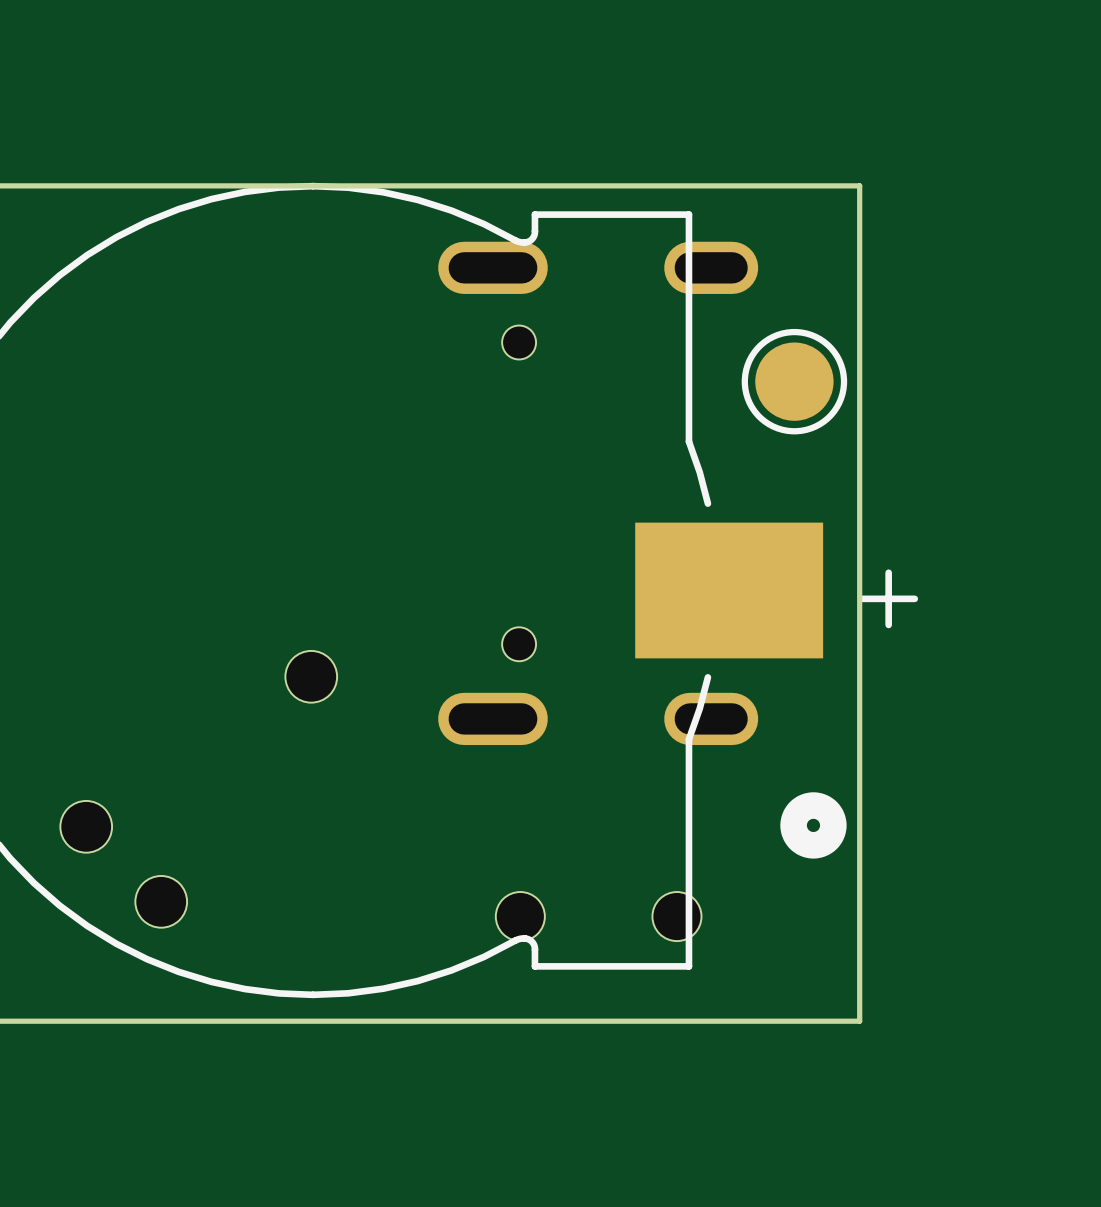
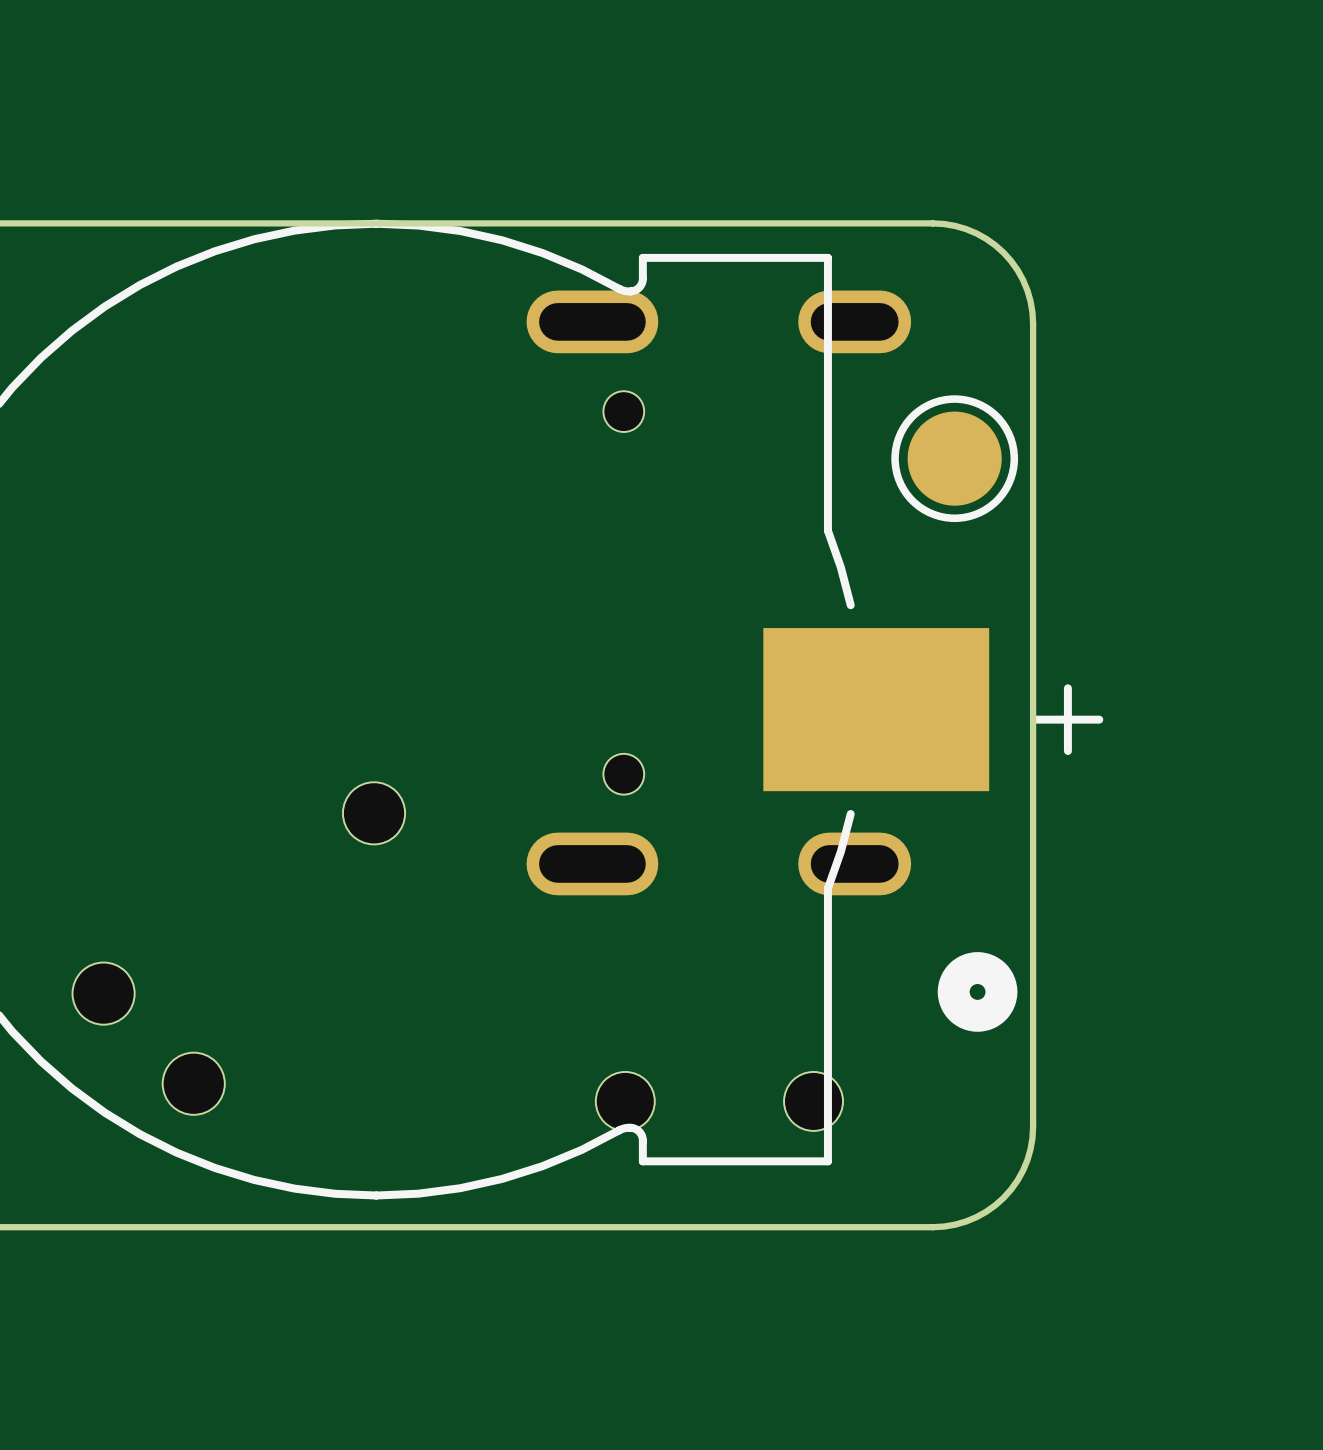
board edge: (776, 185) (859, 185) (859, 269) -> (932, 223) (955, 225) (976, 233) (1003, 252) (1017, 270) (1027, 290) (1033, 323)
board edge: (859, 937) (859, 1021) (776, 1021) -> (1033, 1126) (1030, 1149) (1023, 1170) (1003, 1197) (986, 1211) (965, 1221) (932, 1227)

